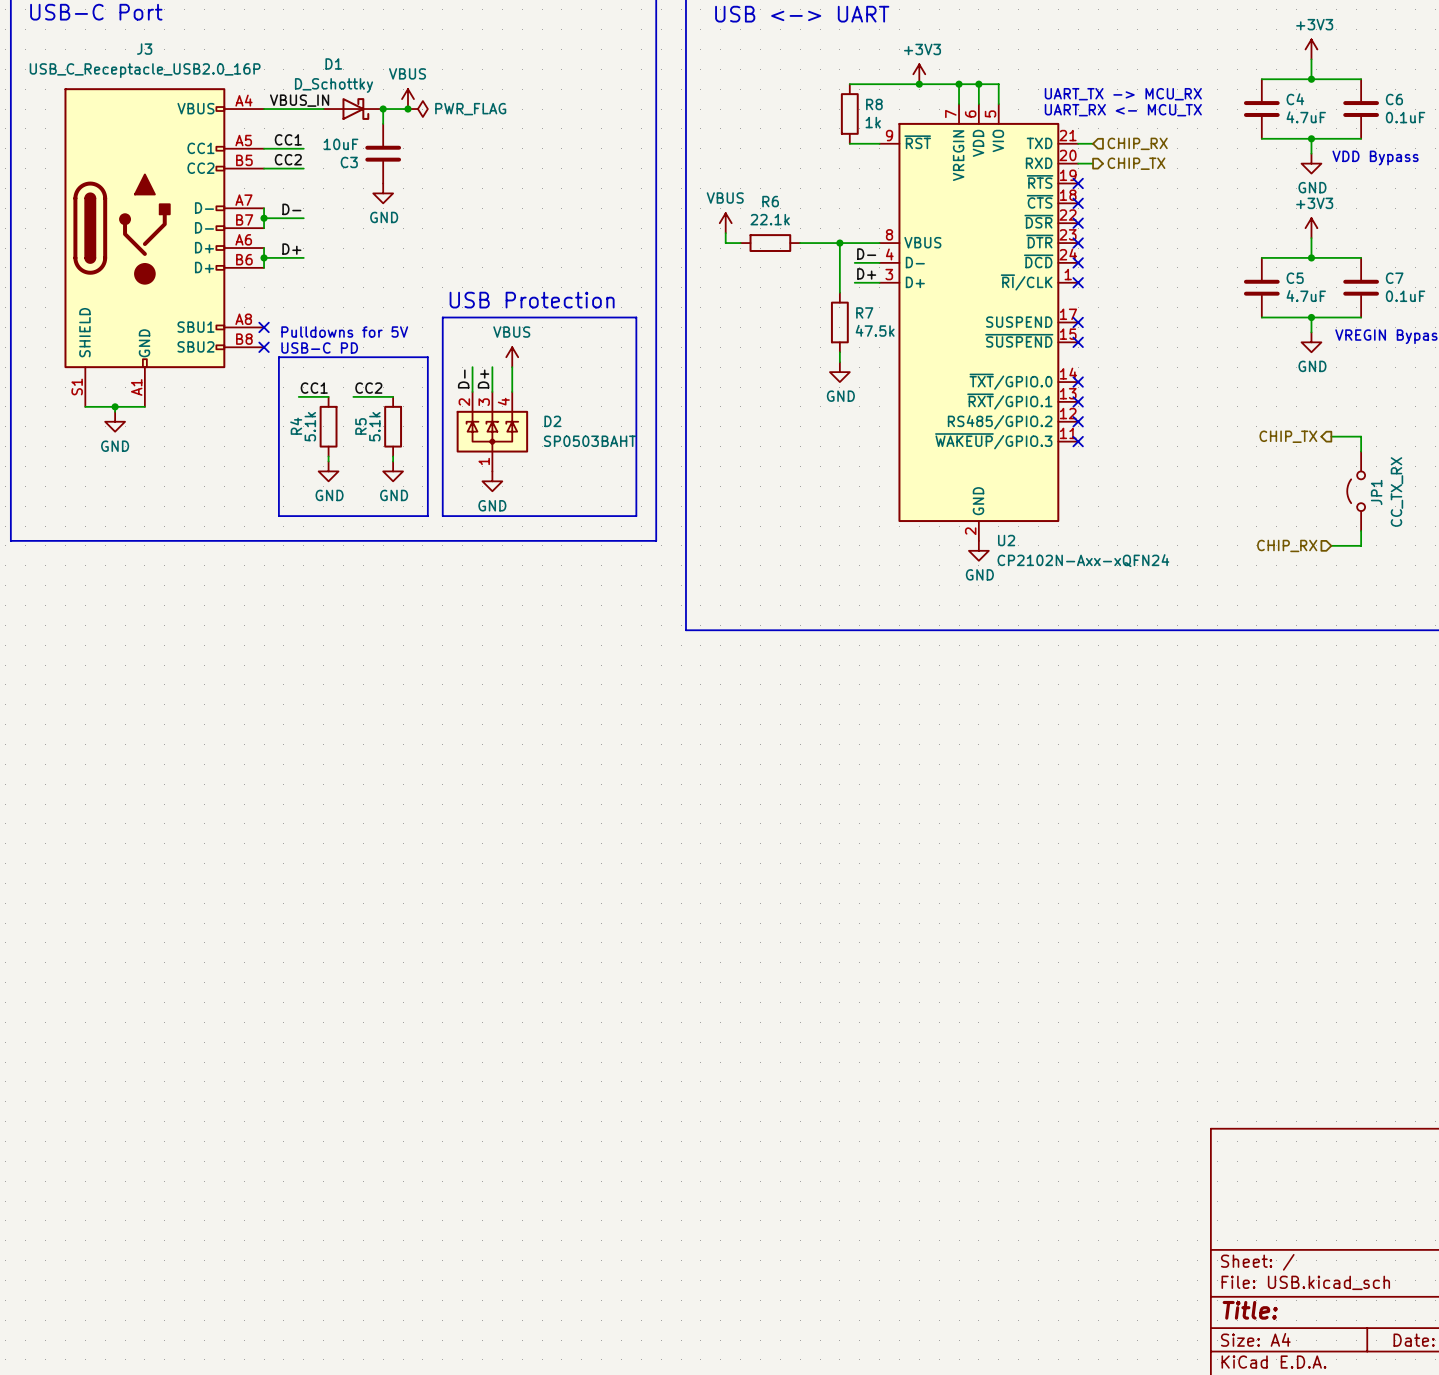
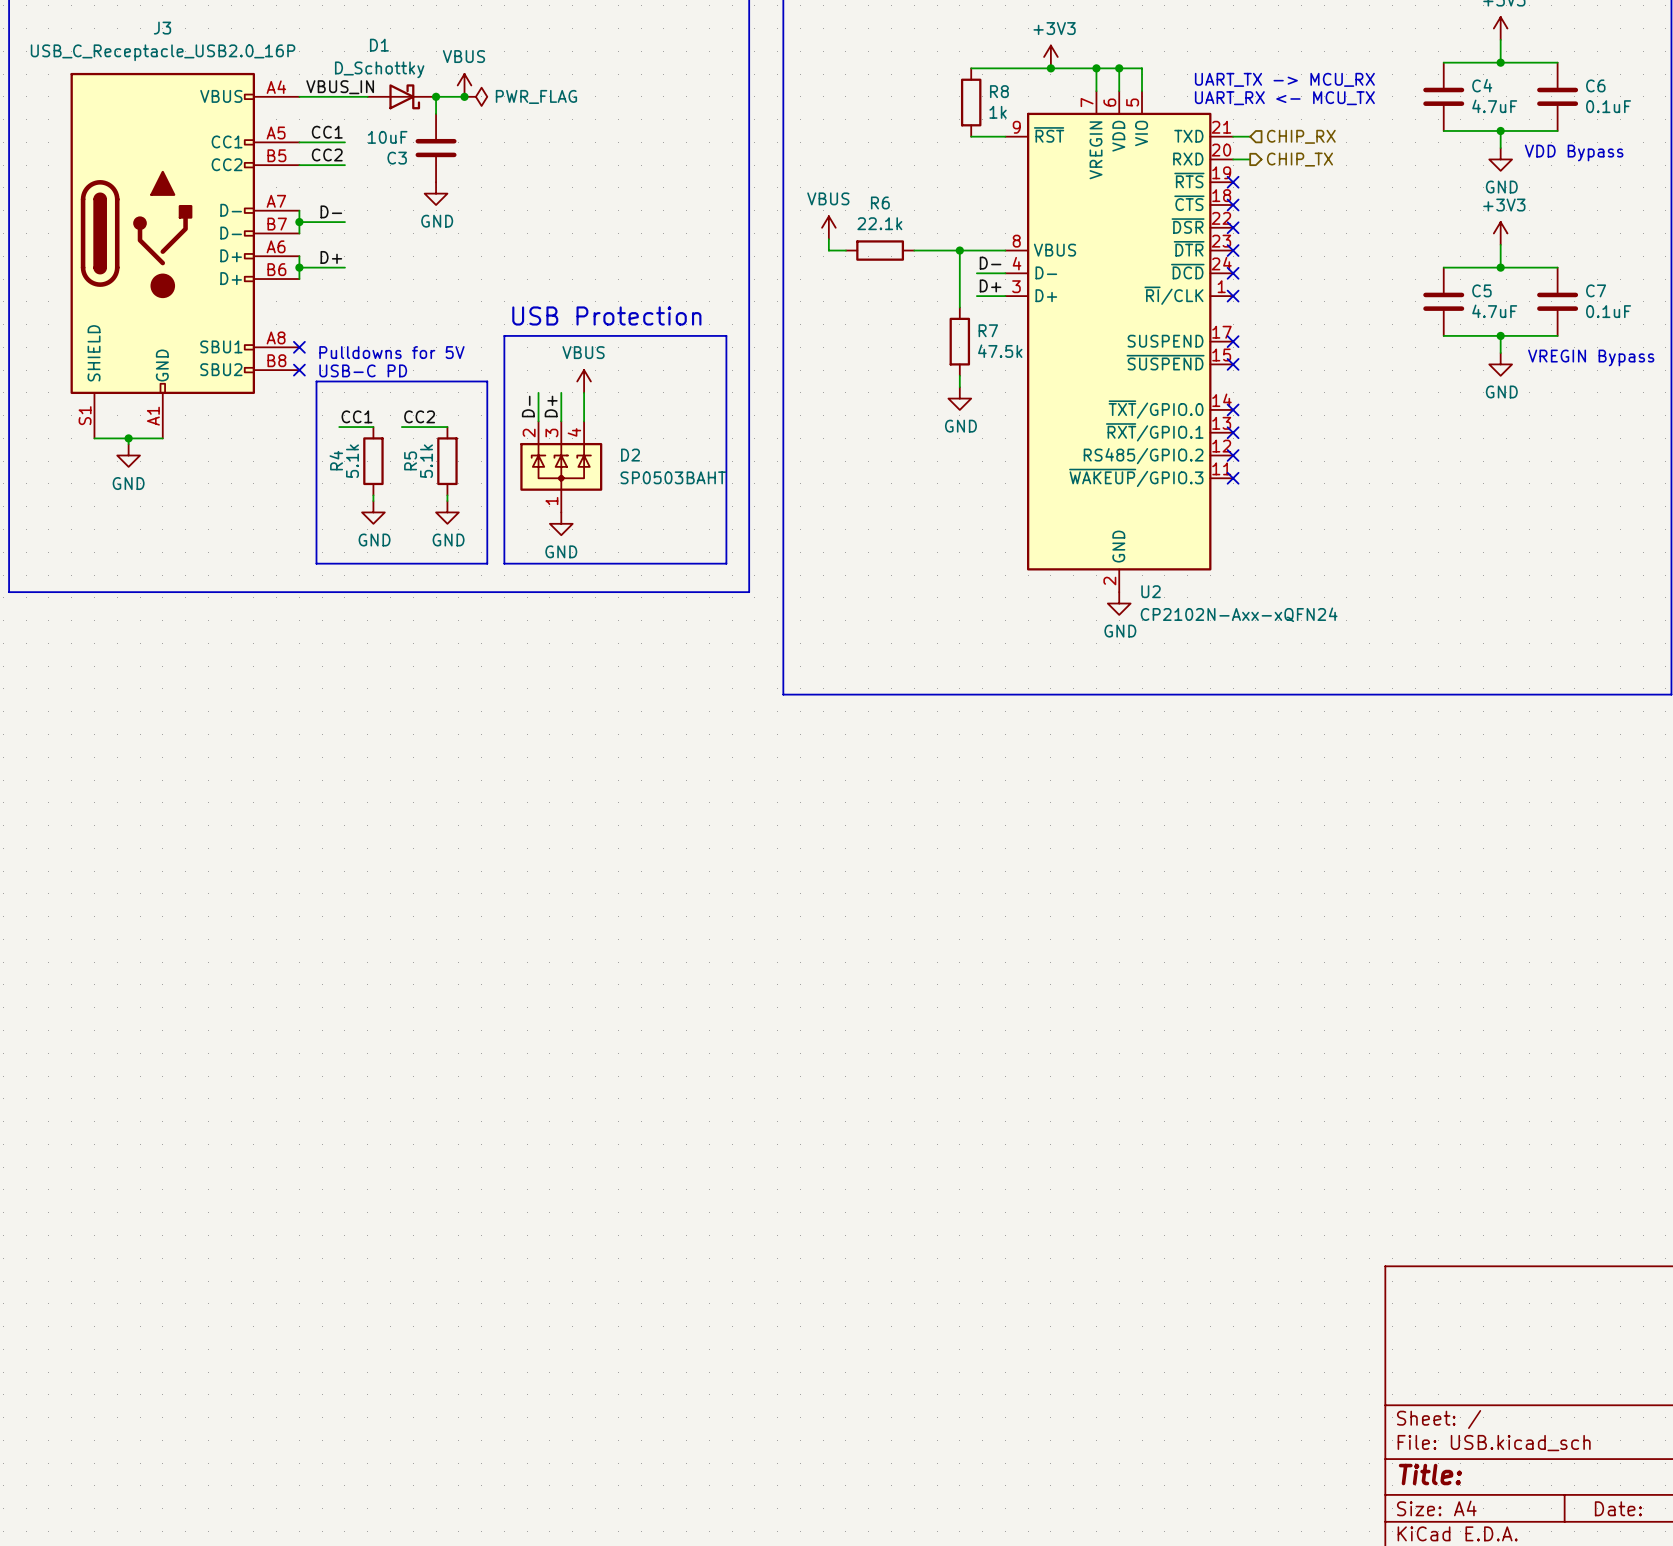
hierarchical label: CHIP_TX (1288, 436) -> none
wire: (1331, 436) (1361, 436) (1361, 451) -> none
JP1: CC_TX_RX (1356, 491) -> none
wire: (1361, 530) (1361, 545) (1331, 545) -> none
hierarchical label: CHIP_RX (1287, 545) -> none

